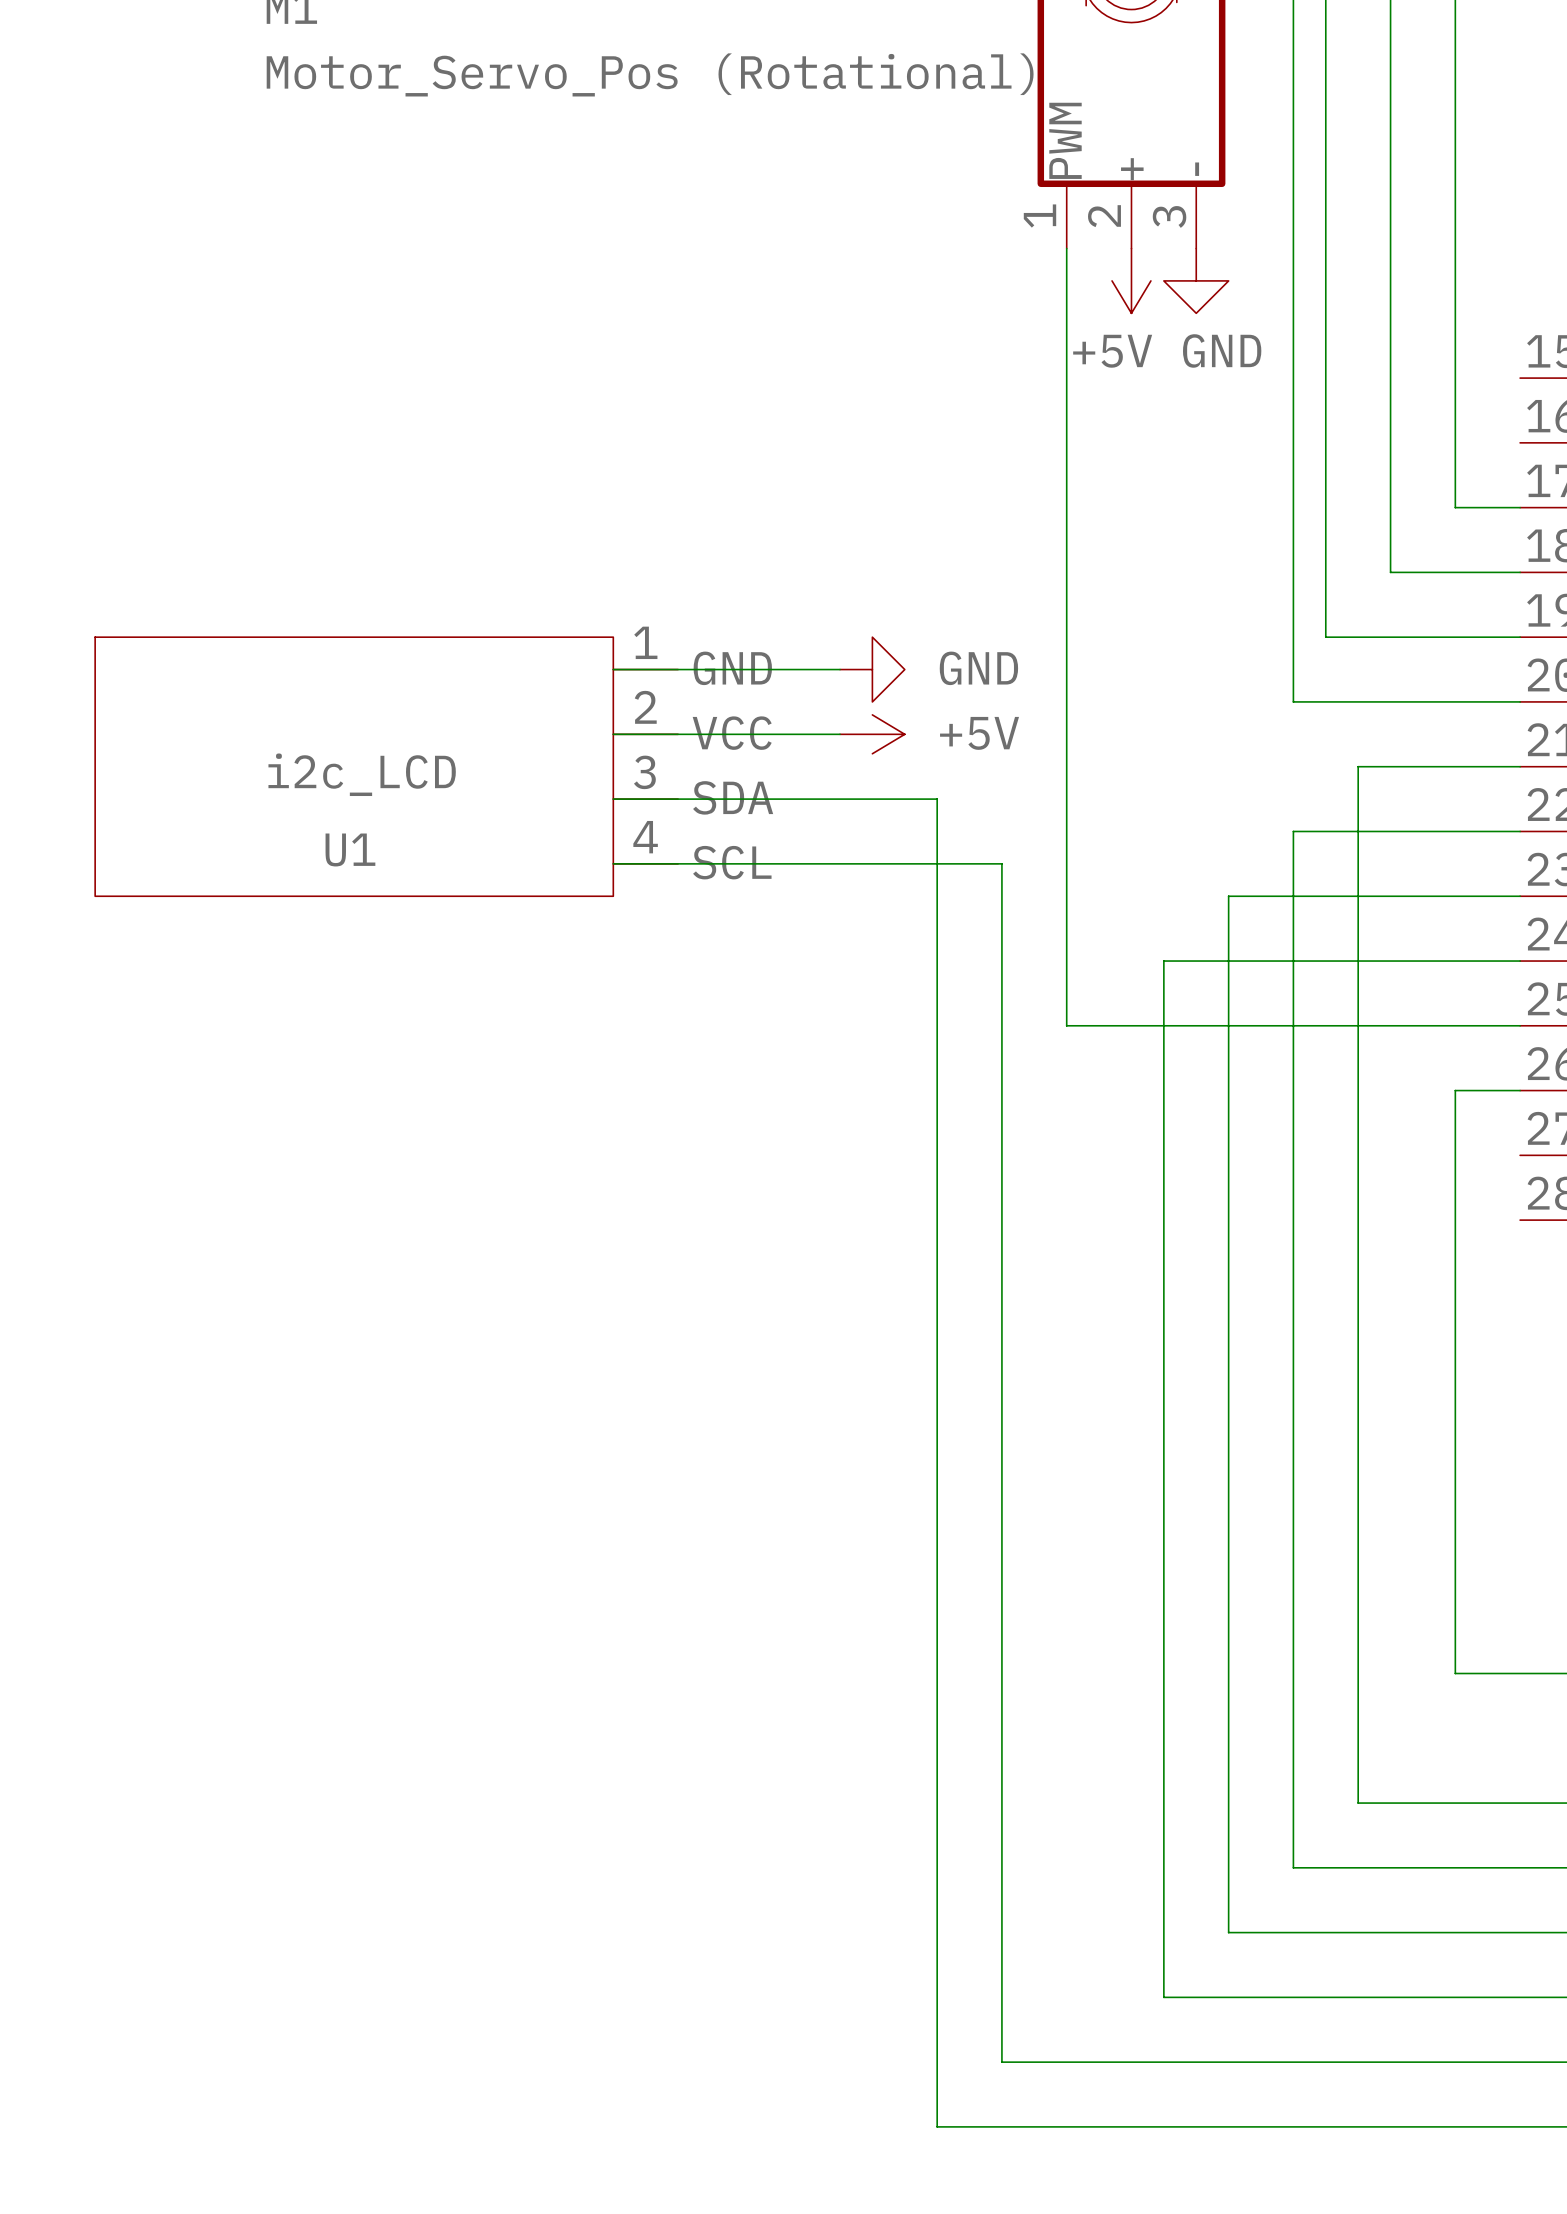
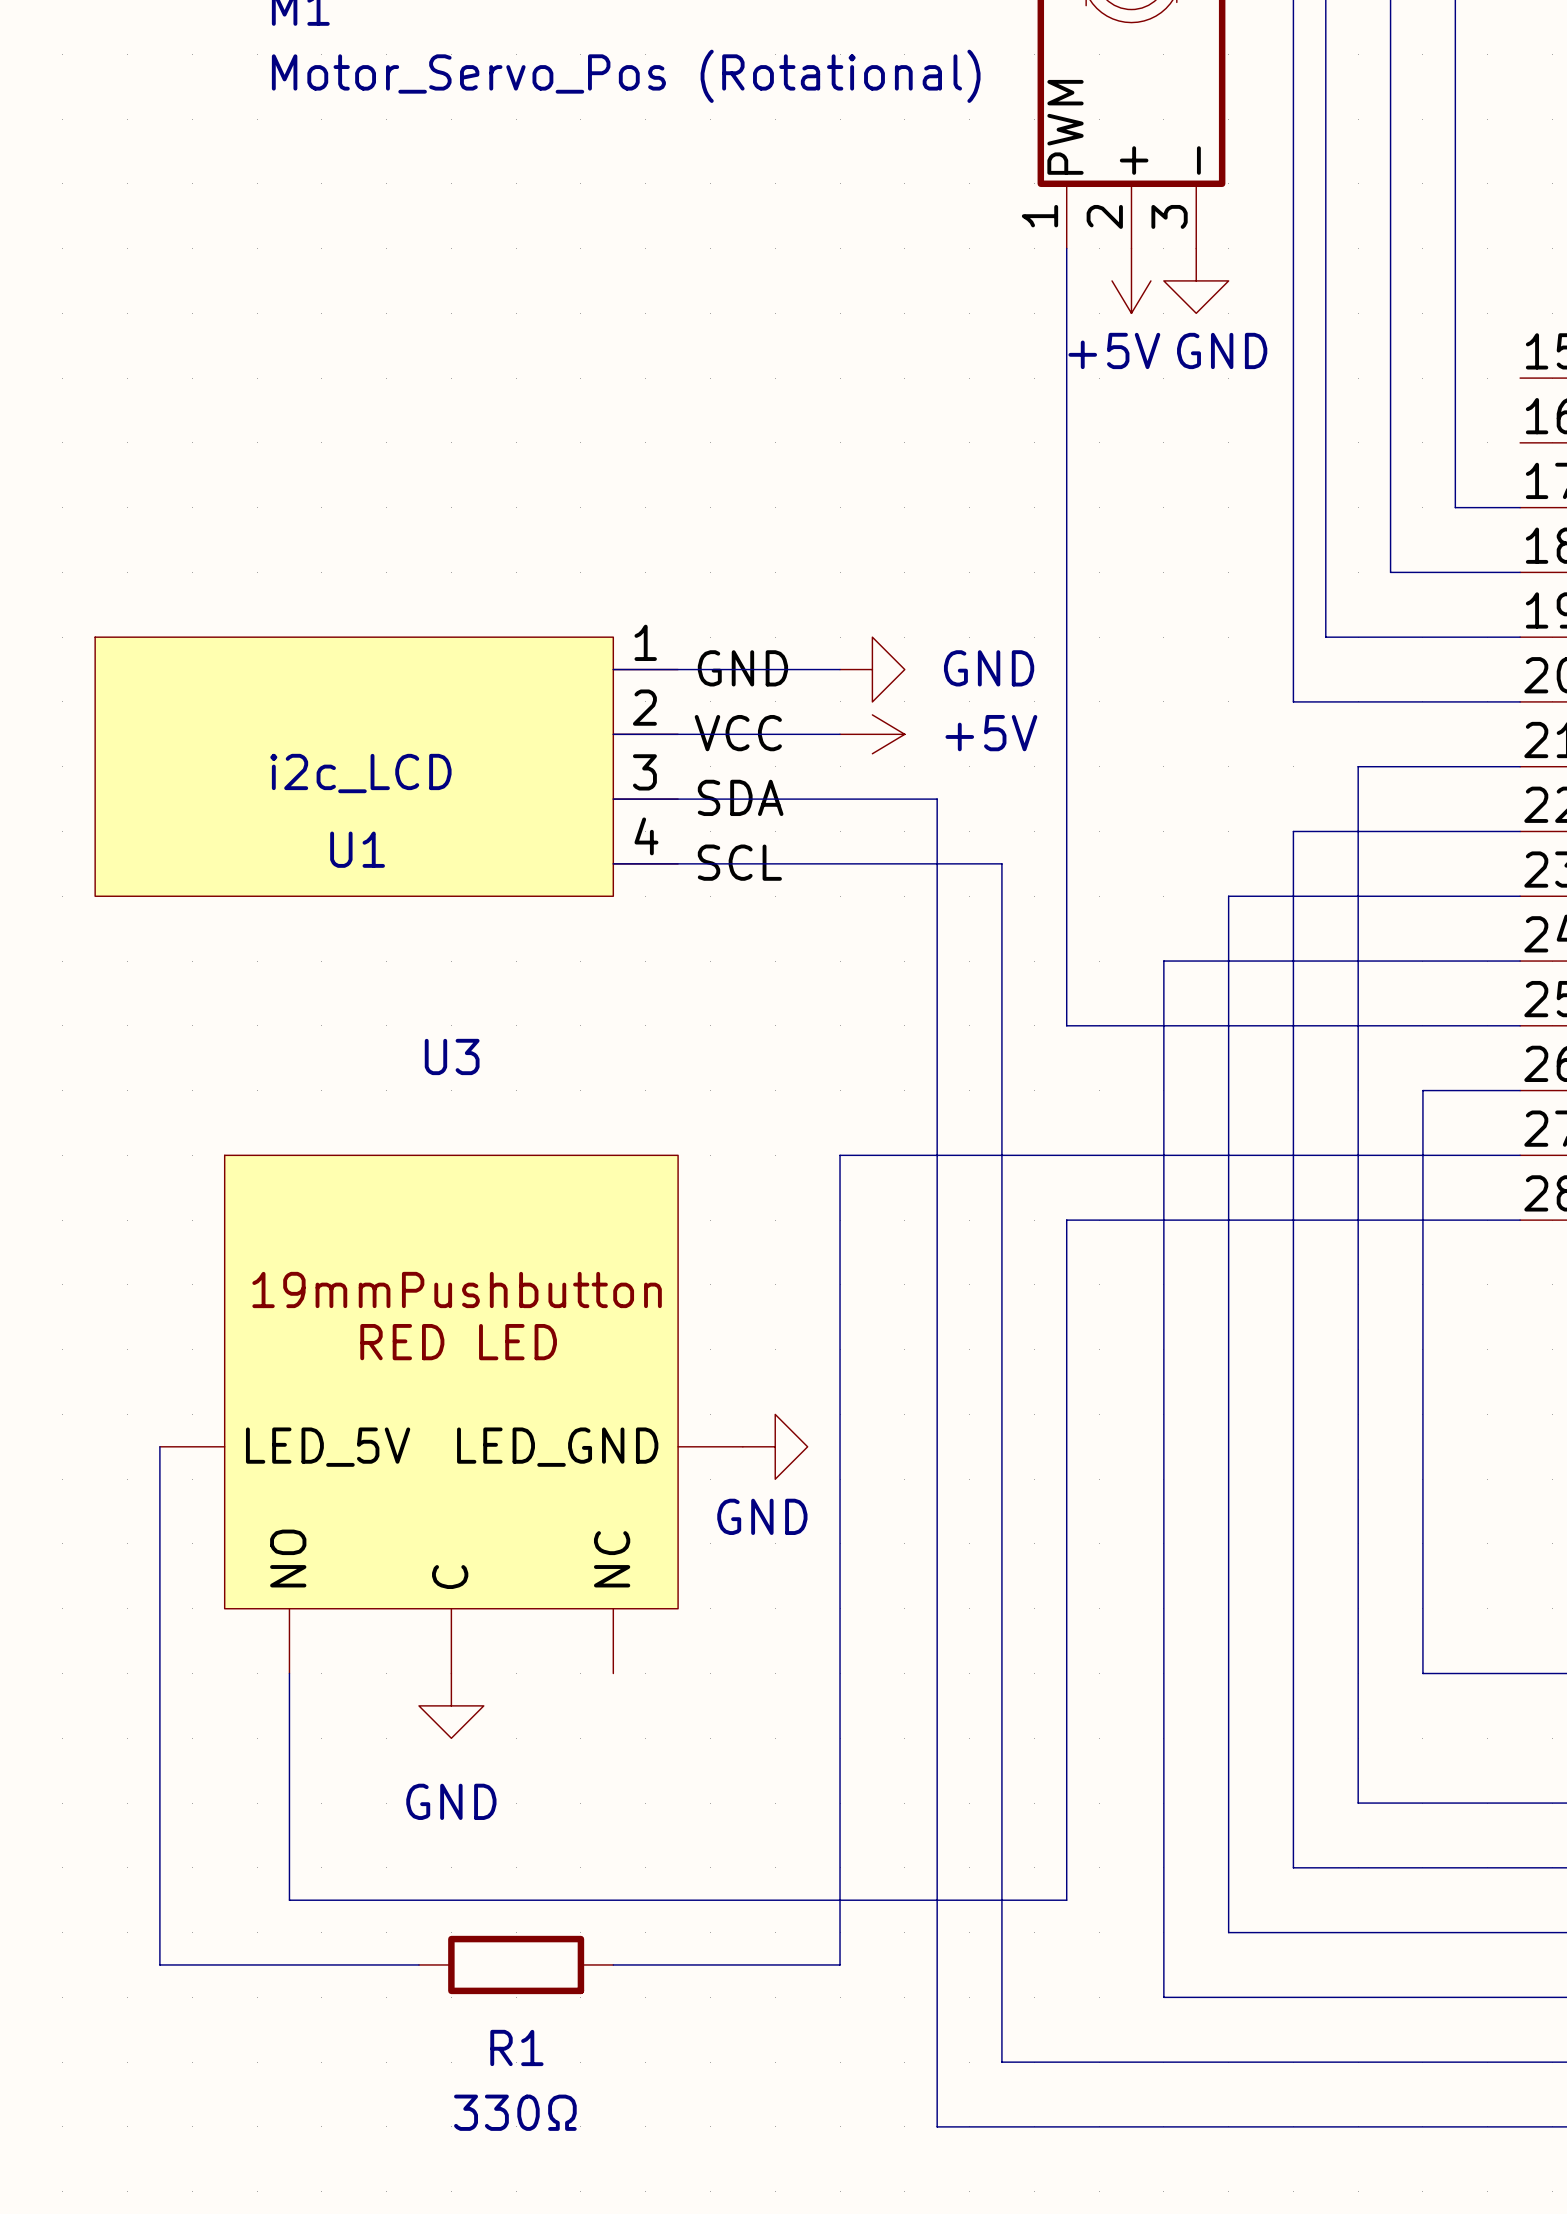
wire: (1455, 1090) (1455, 1673) -> (1455, 1090) (1422, 1090) (1422, 1673) (1455, 1673)
wire: none -> (1520, 1155) (840, 1155) (840, 1964) (613, 1964)
wire: none -> (1520, 1220) (1066, 1220) (1066, 1900) (289, 1900) (289, 1673)
U3: none -> (451, 1414)
wire: none -> (159, 1446) (159, 1964) (418, 1964)
power symbol: none -> GND (775, 1446)
power symbol: none -> GND (451, 1705)
R1: none -> 330Ω (516, 1964)

